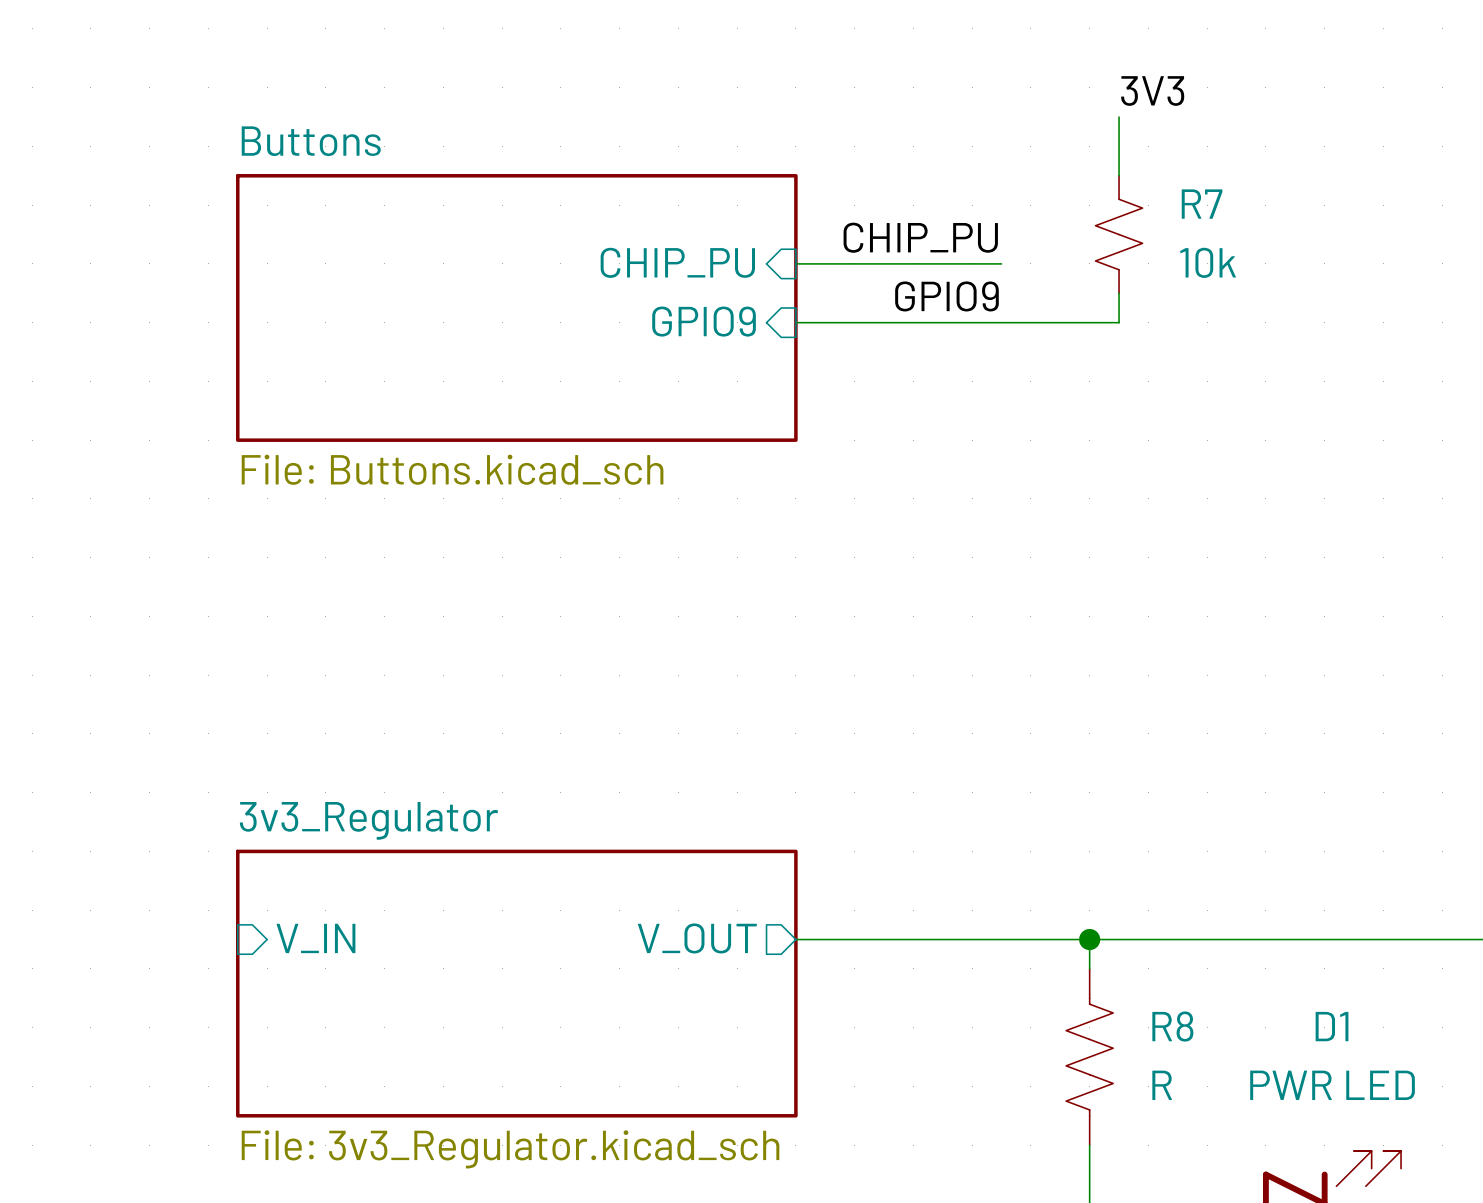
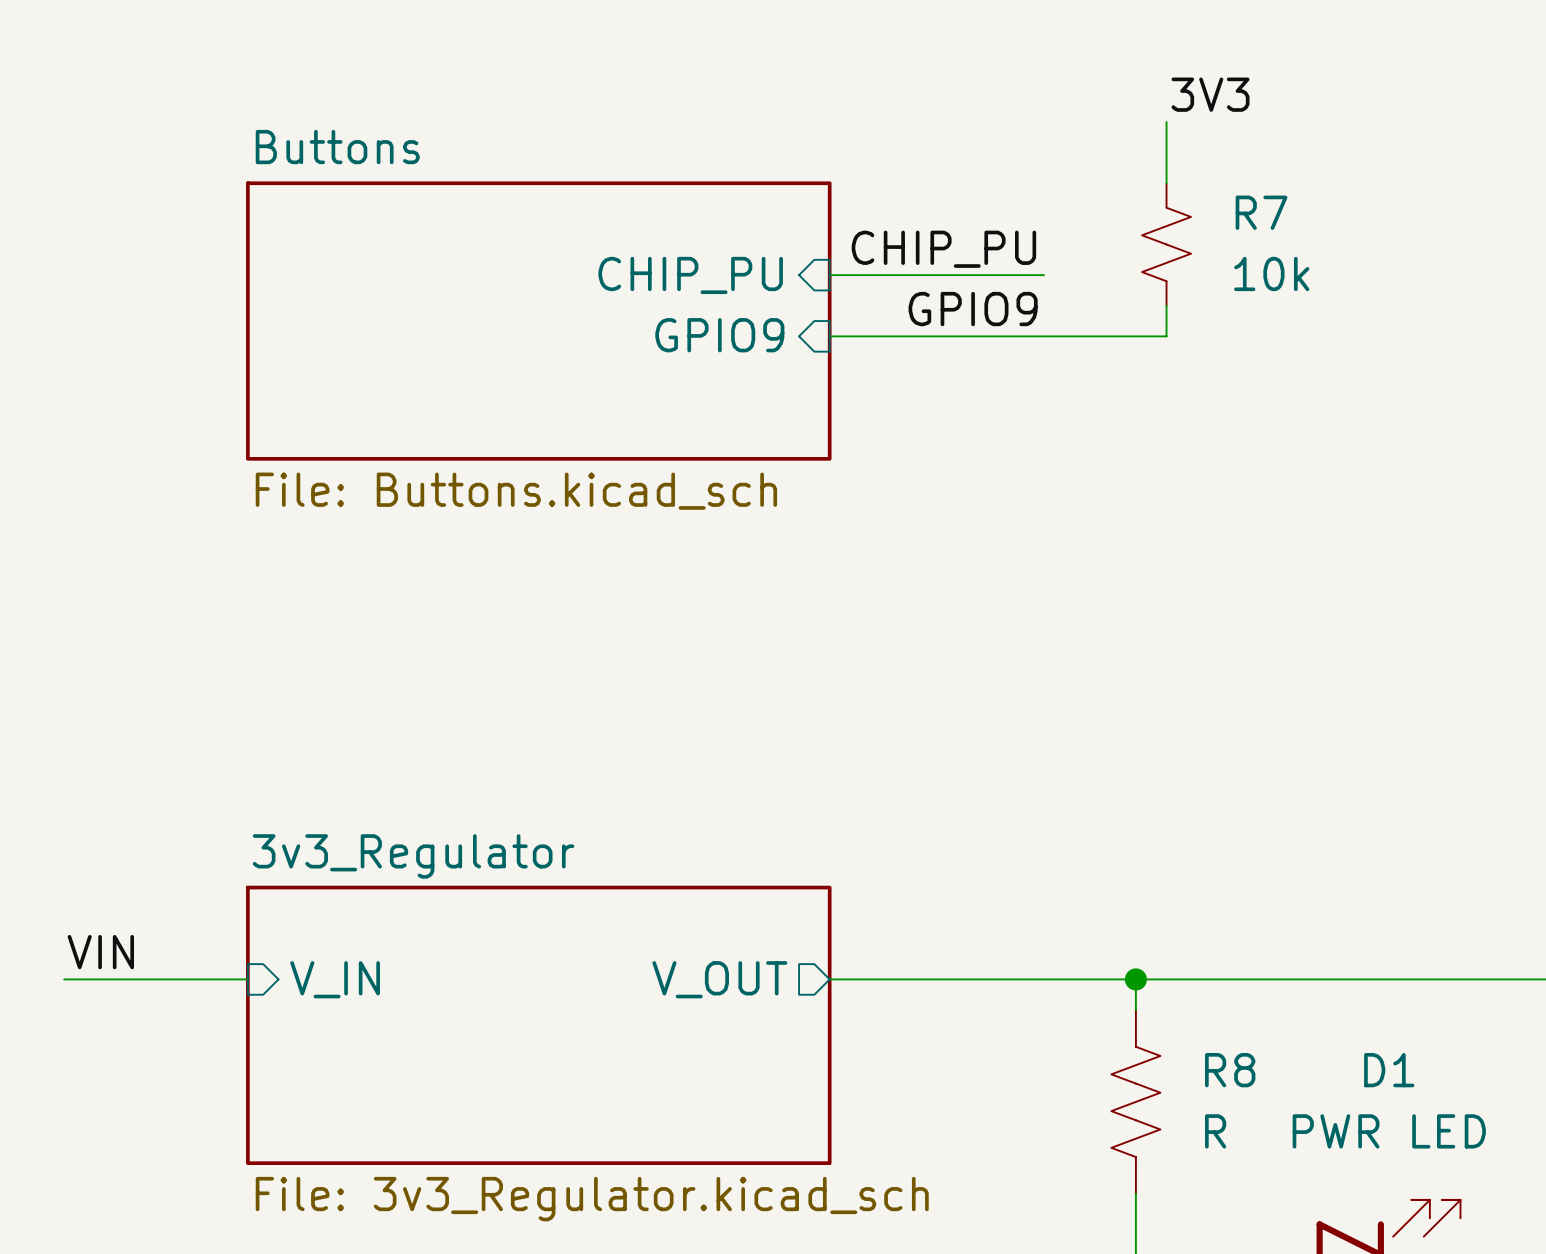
label: none -> VIN (100, 952)
wire: none -> (64, 979) (247, 979)

